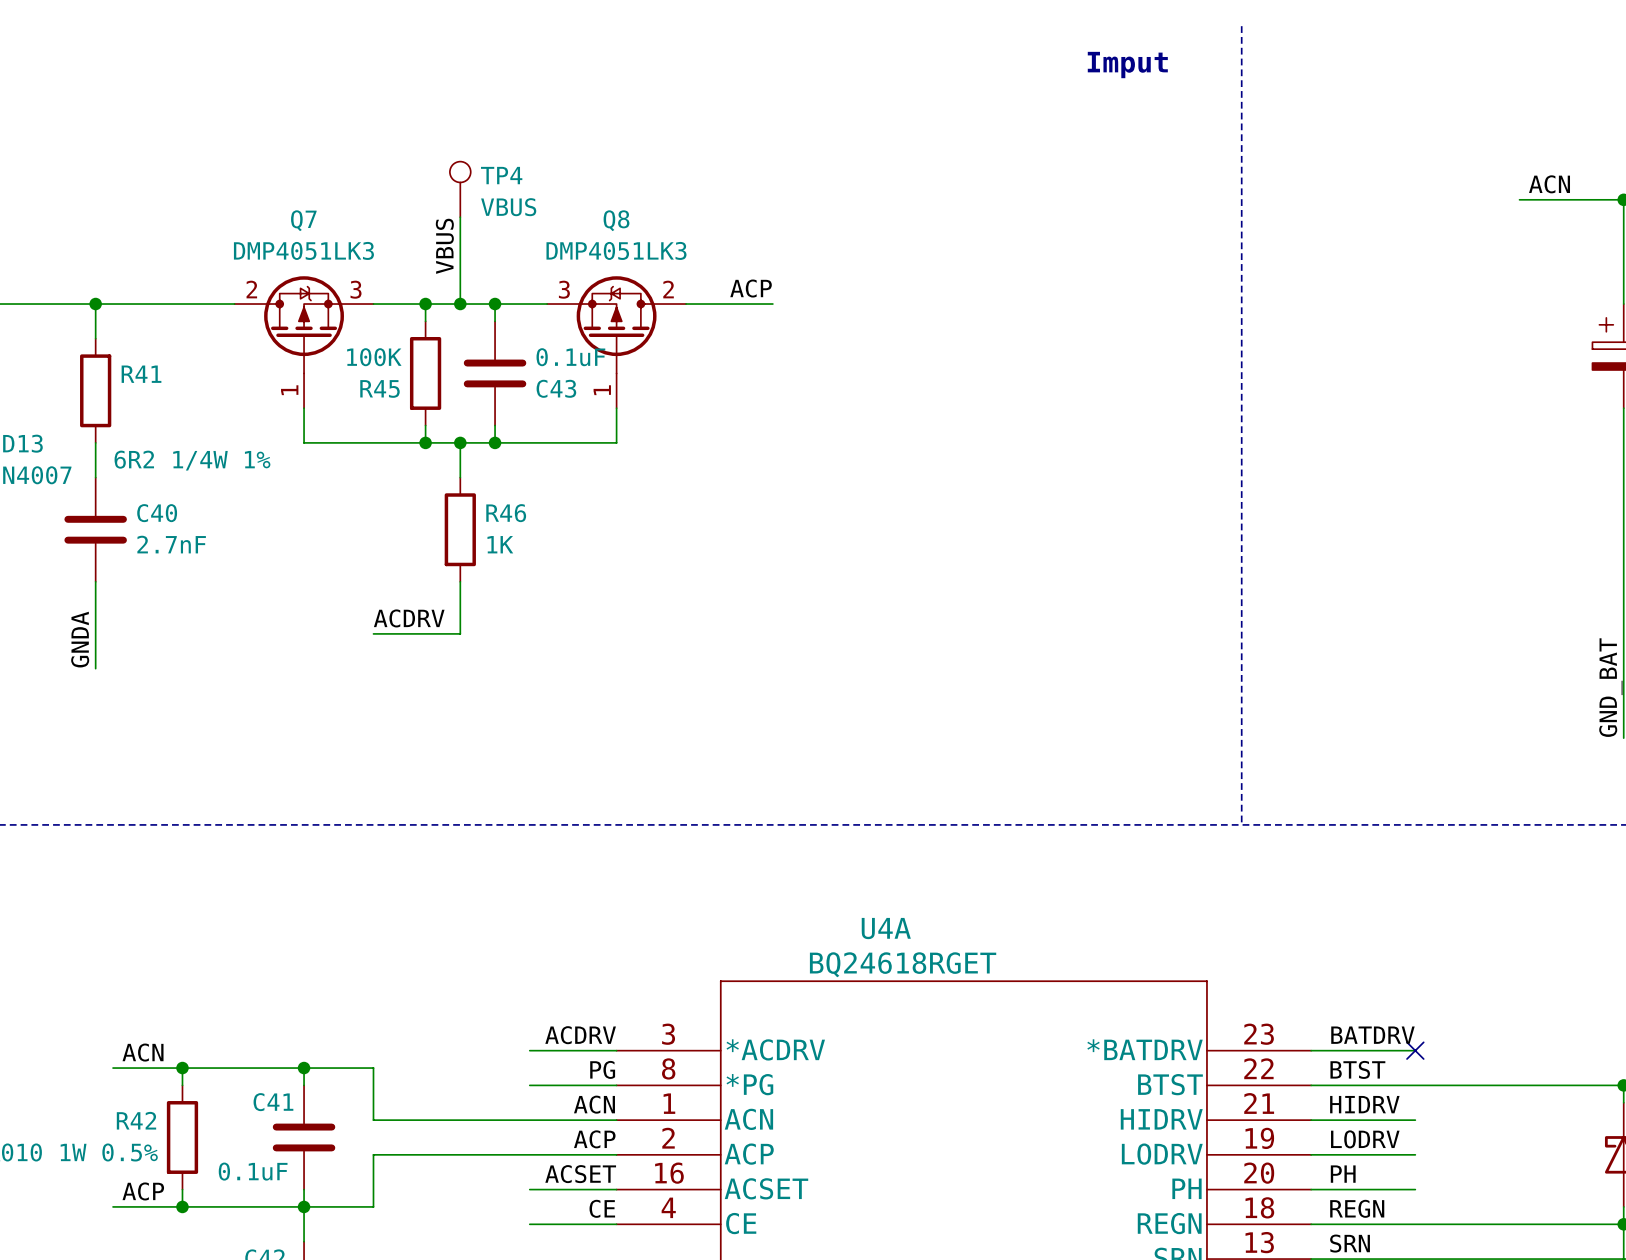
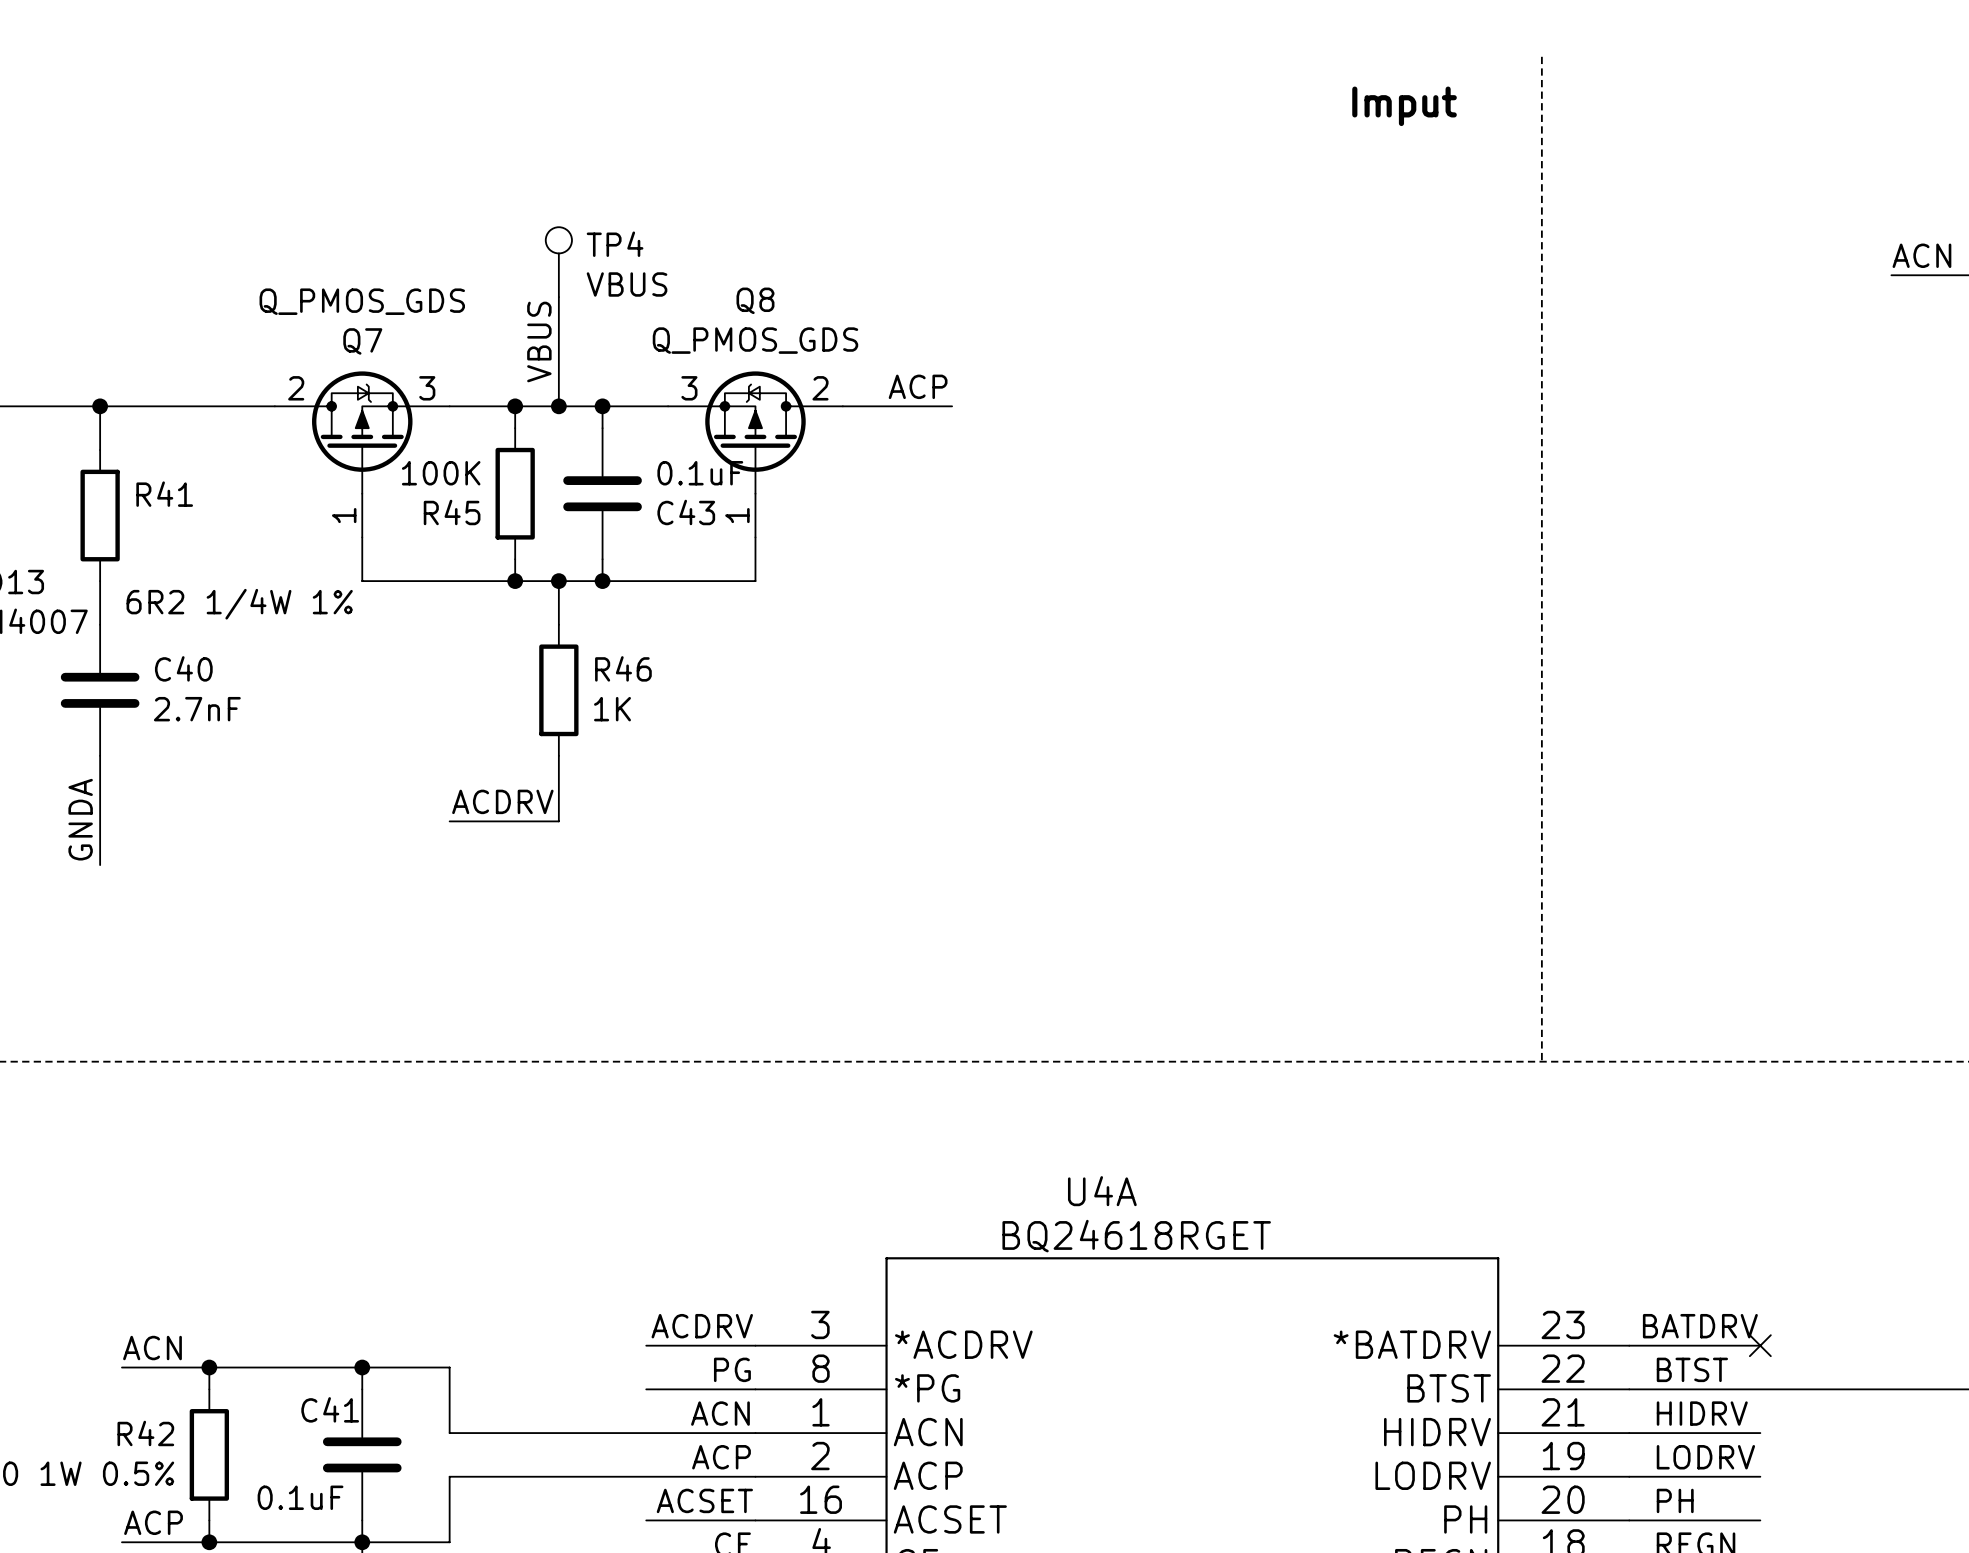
Q7 name position: Q7 (303, 220) -> Q7 (362, 341)
Q7 value: DMP4051LK3 (303, 250) -> Q_PMOS_GDS (362, 301)
Q8 value: DMP4051LK3 (616, 250) -> Q_PMOS_GDS (755, 340)

